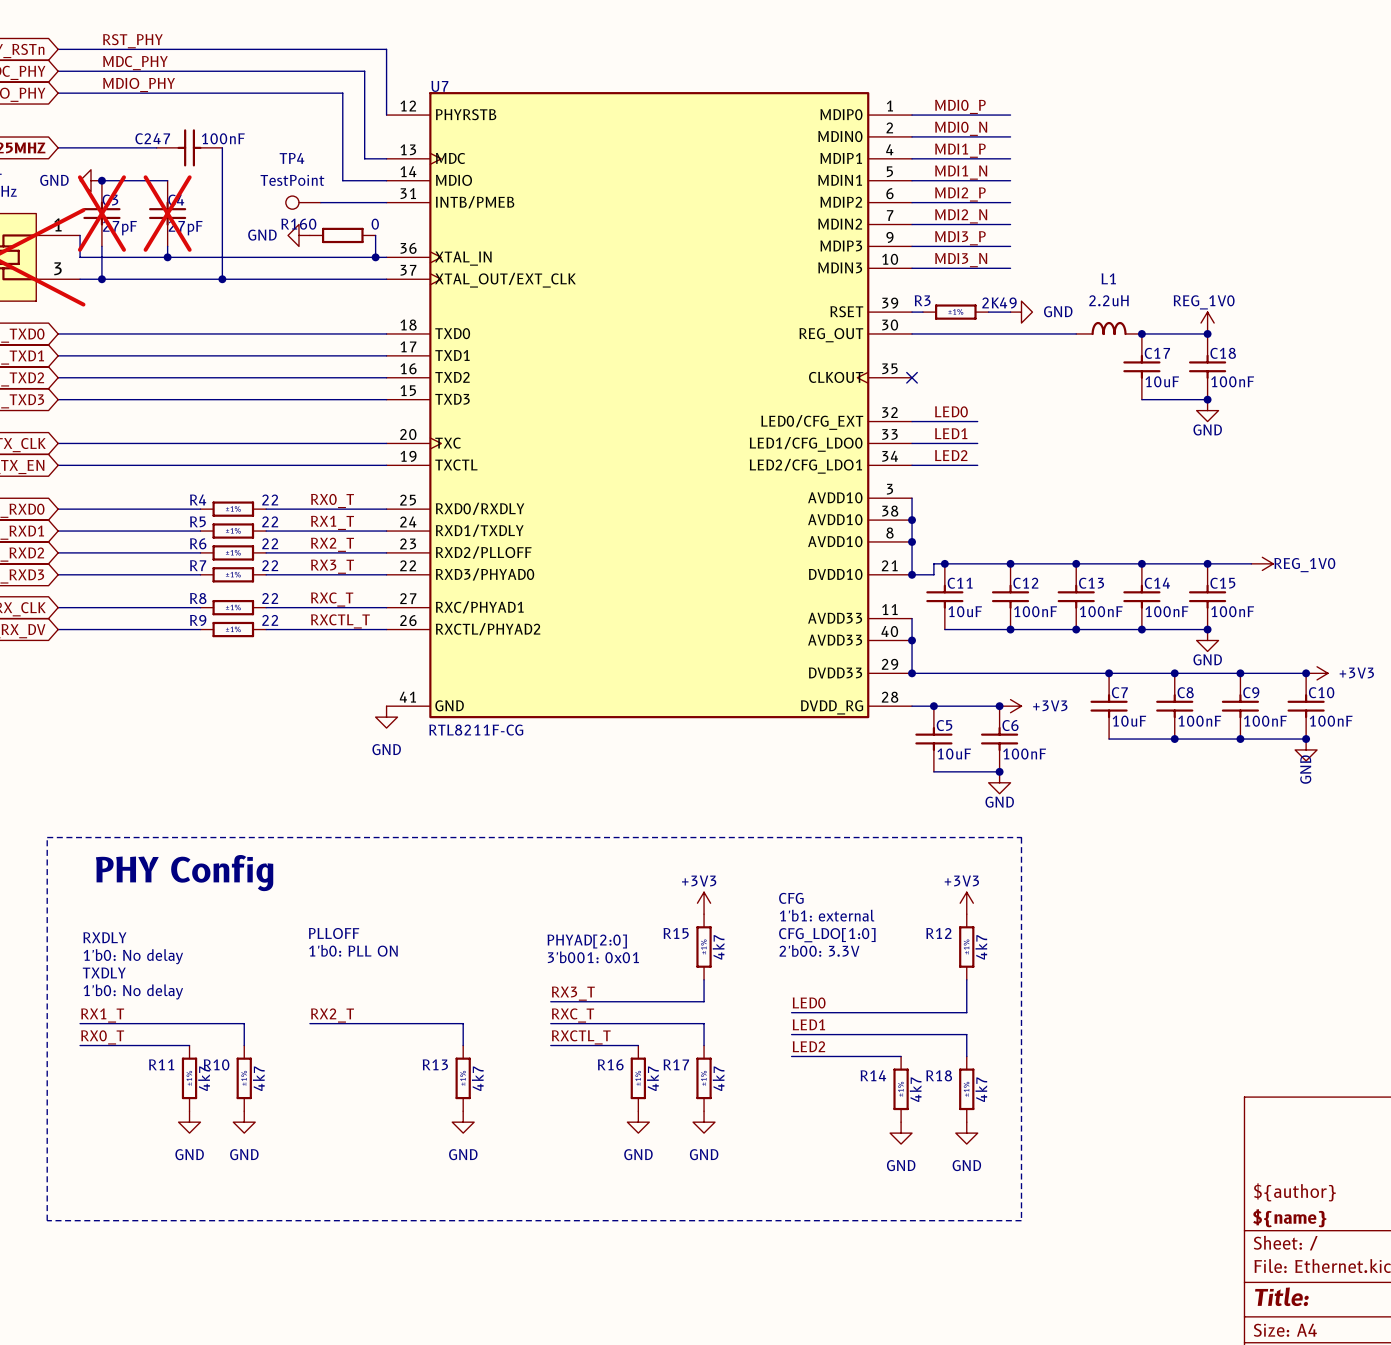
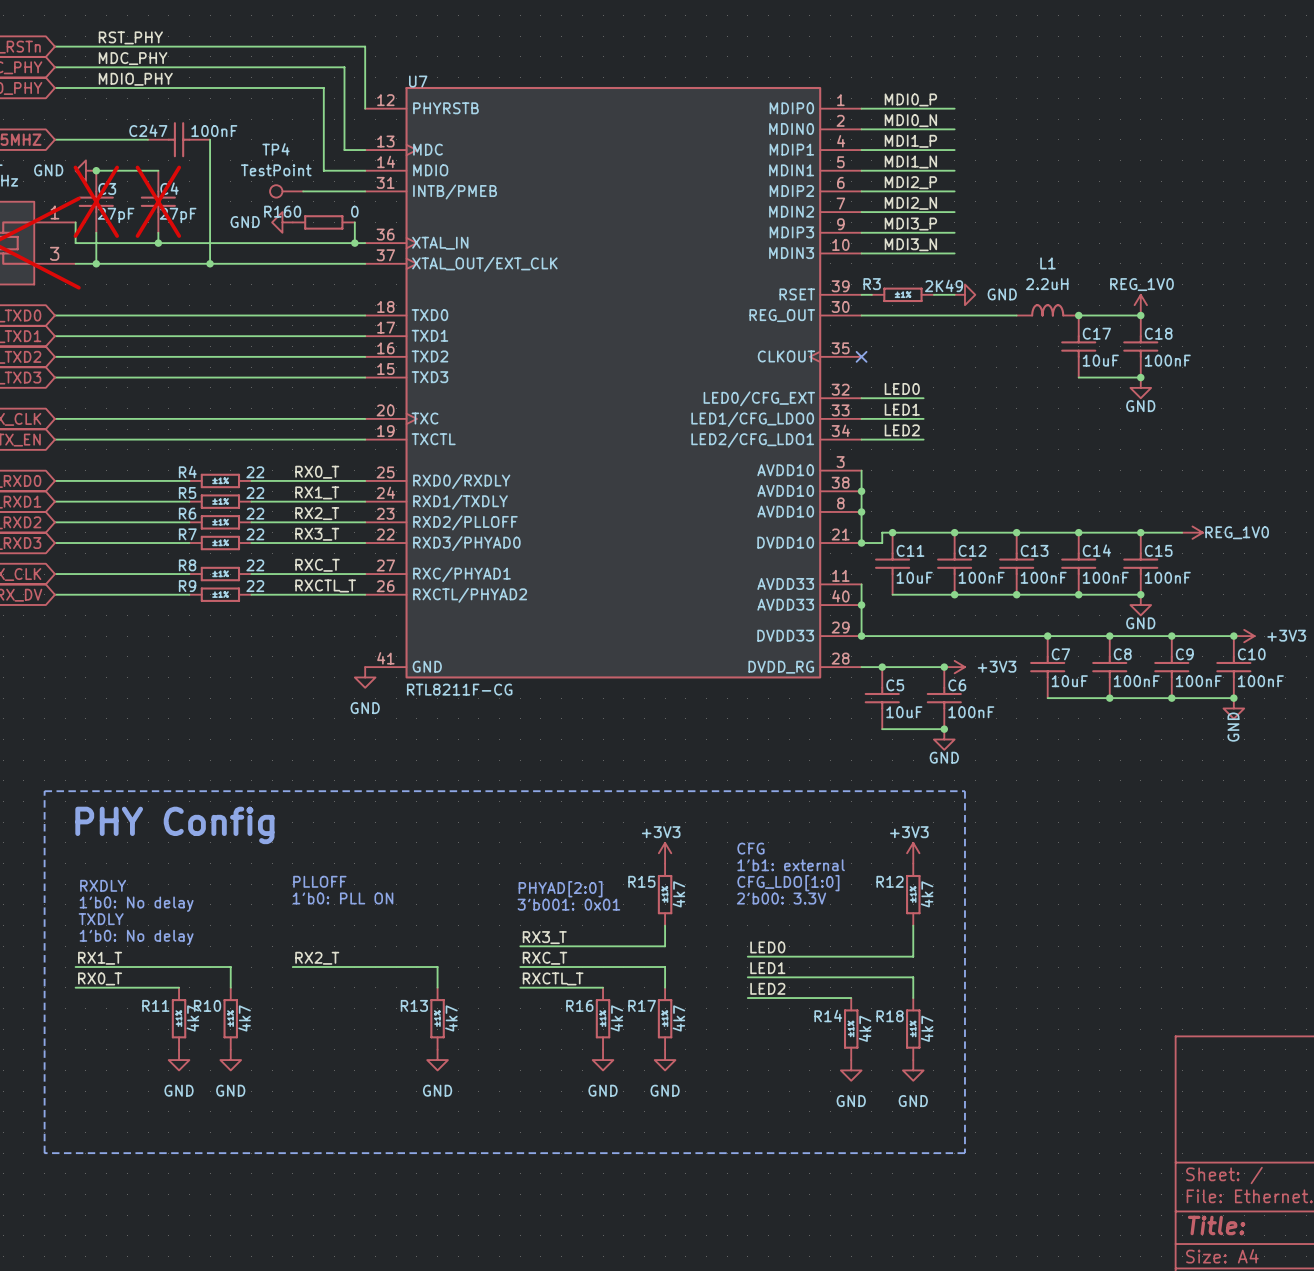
title block: ${author} (1294, 1192) -> none
title block: ${name} (1289, 1218) -> none

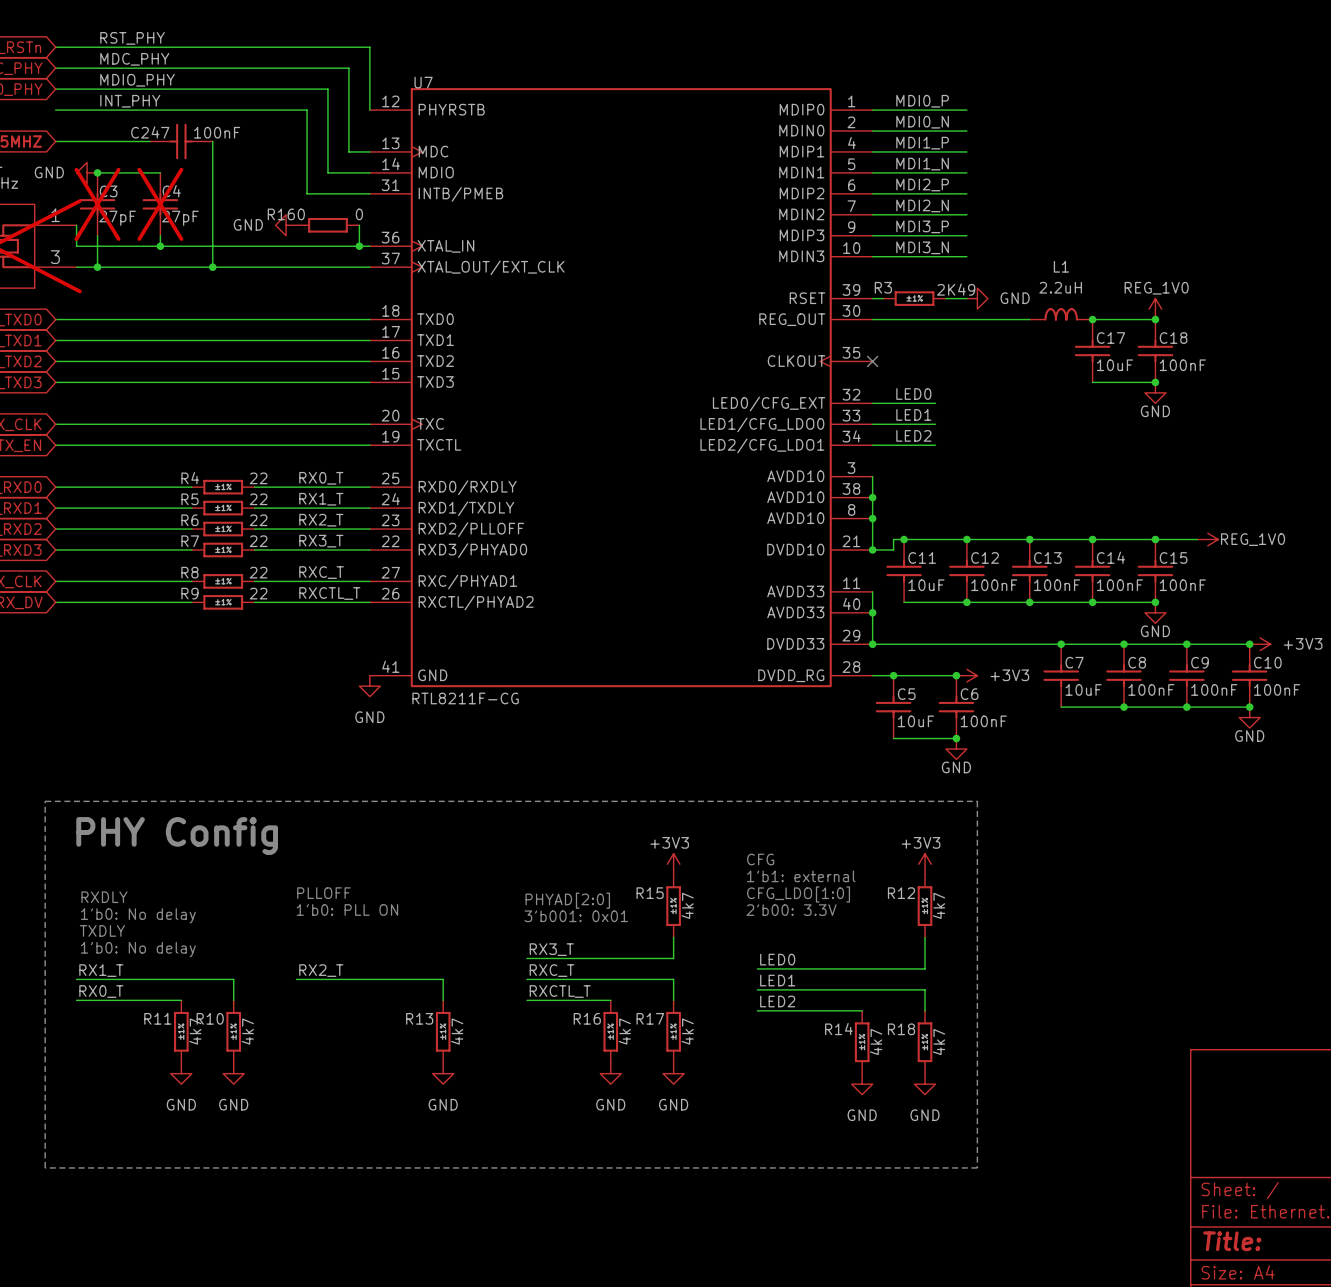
label: none -> INT_PHY (130, 101)
wire: none -> (55, 110) (307, 110) (307, 193)
TP4: TestPoint (286, 191) -> none
power symbol text rotation: 0° (1233, 727) -> 90° clockwise (1249, 736)

